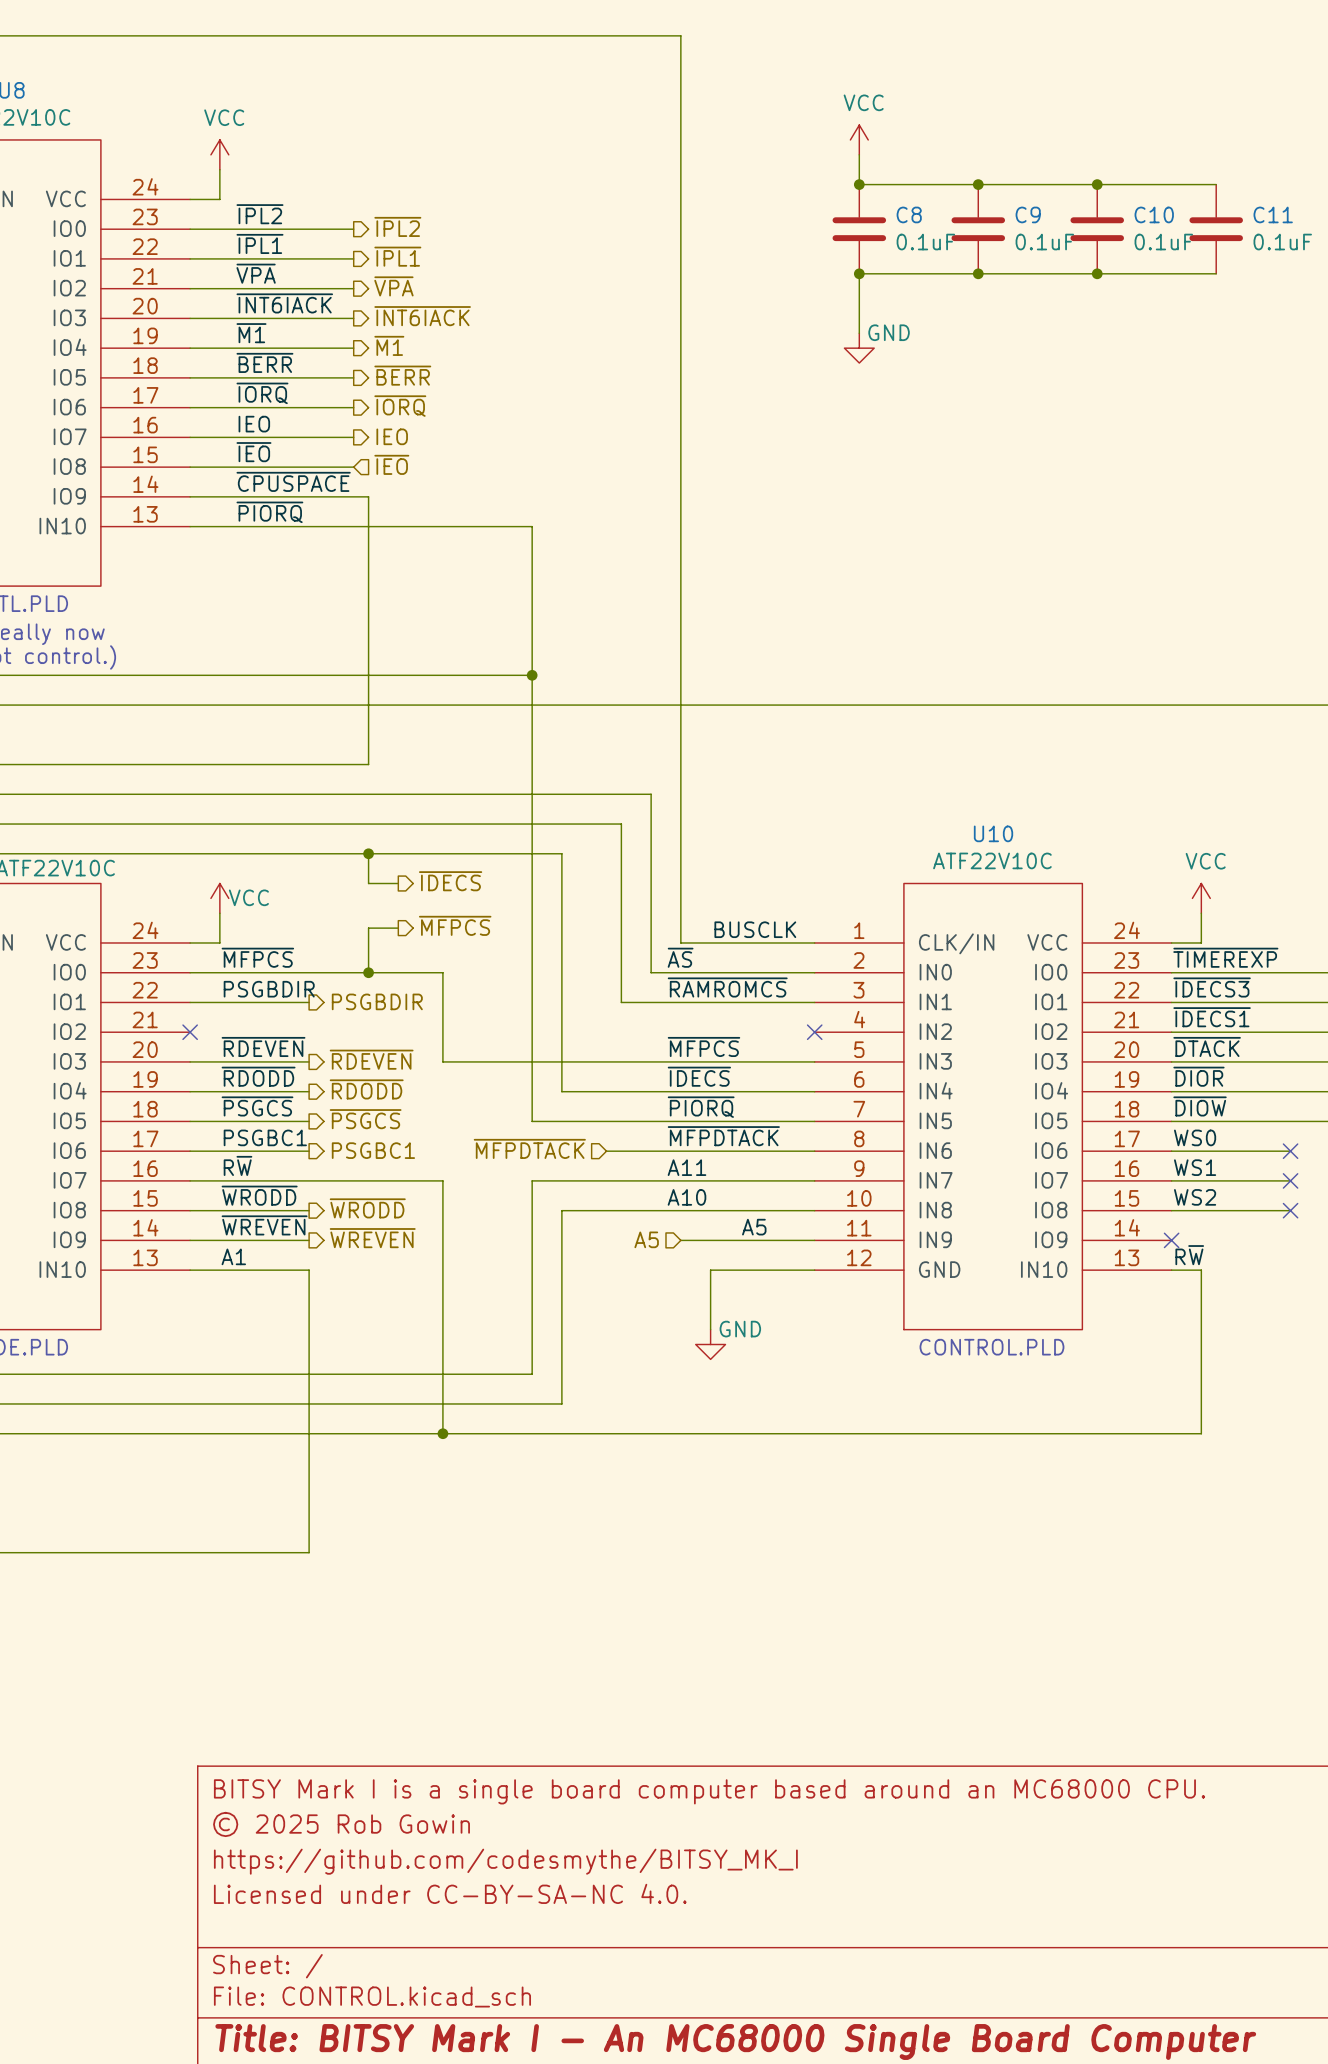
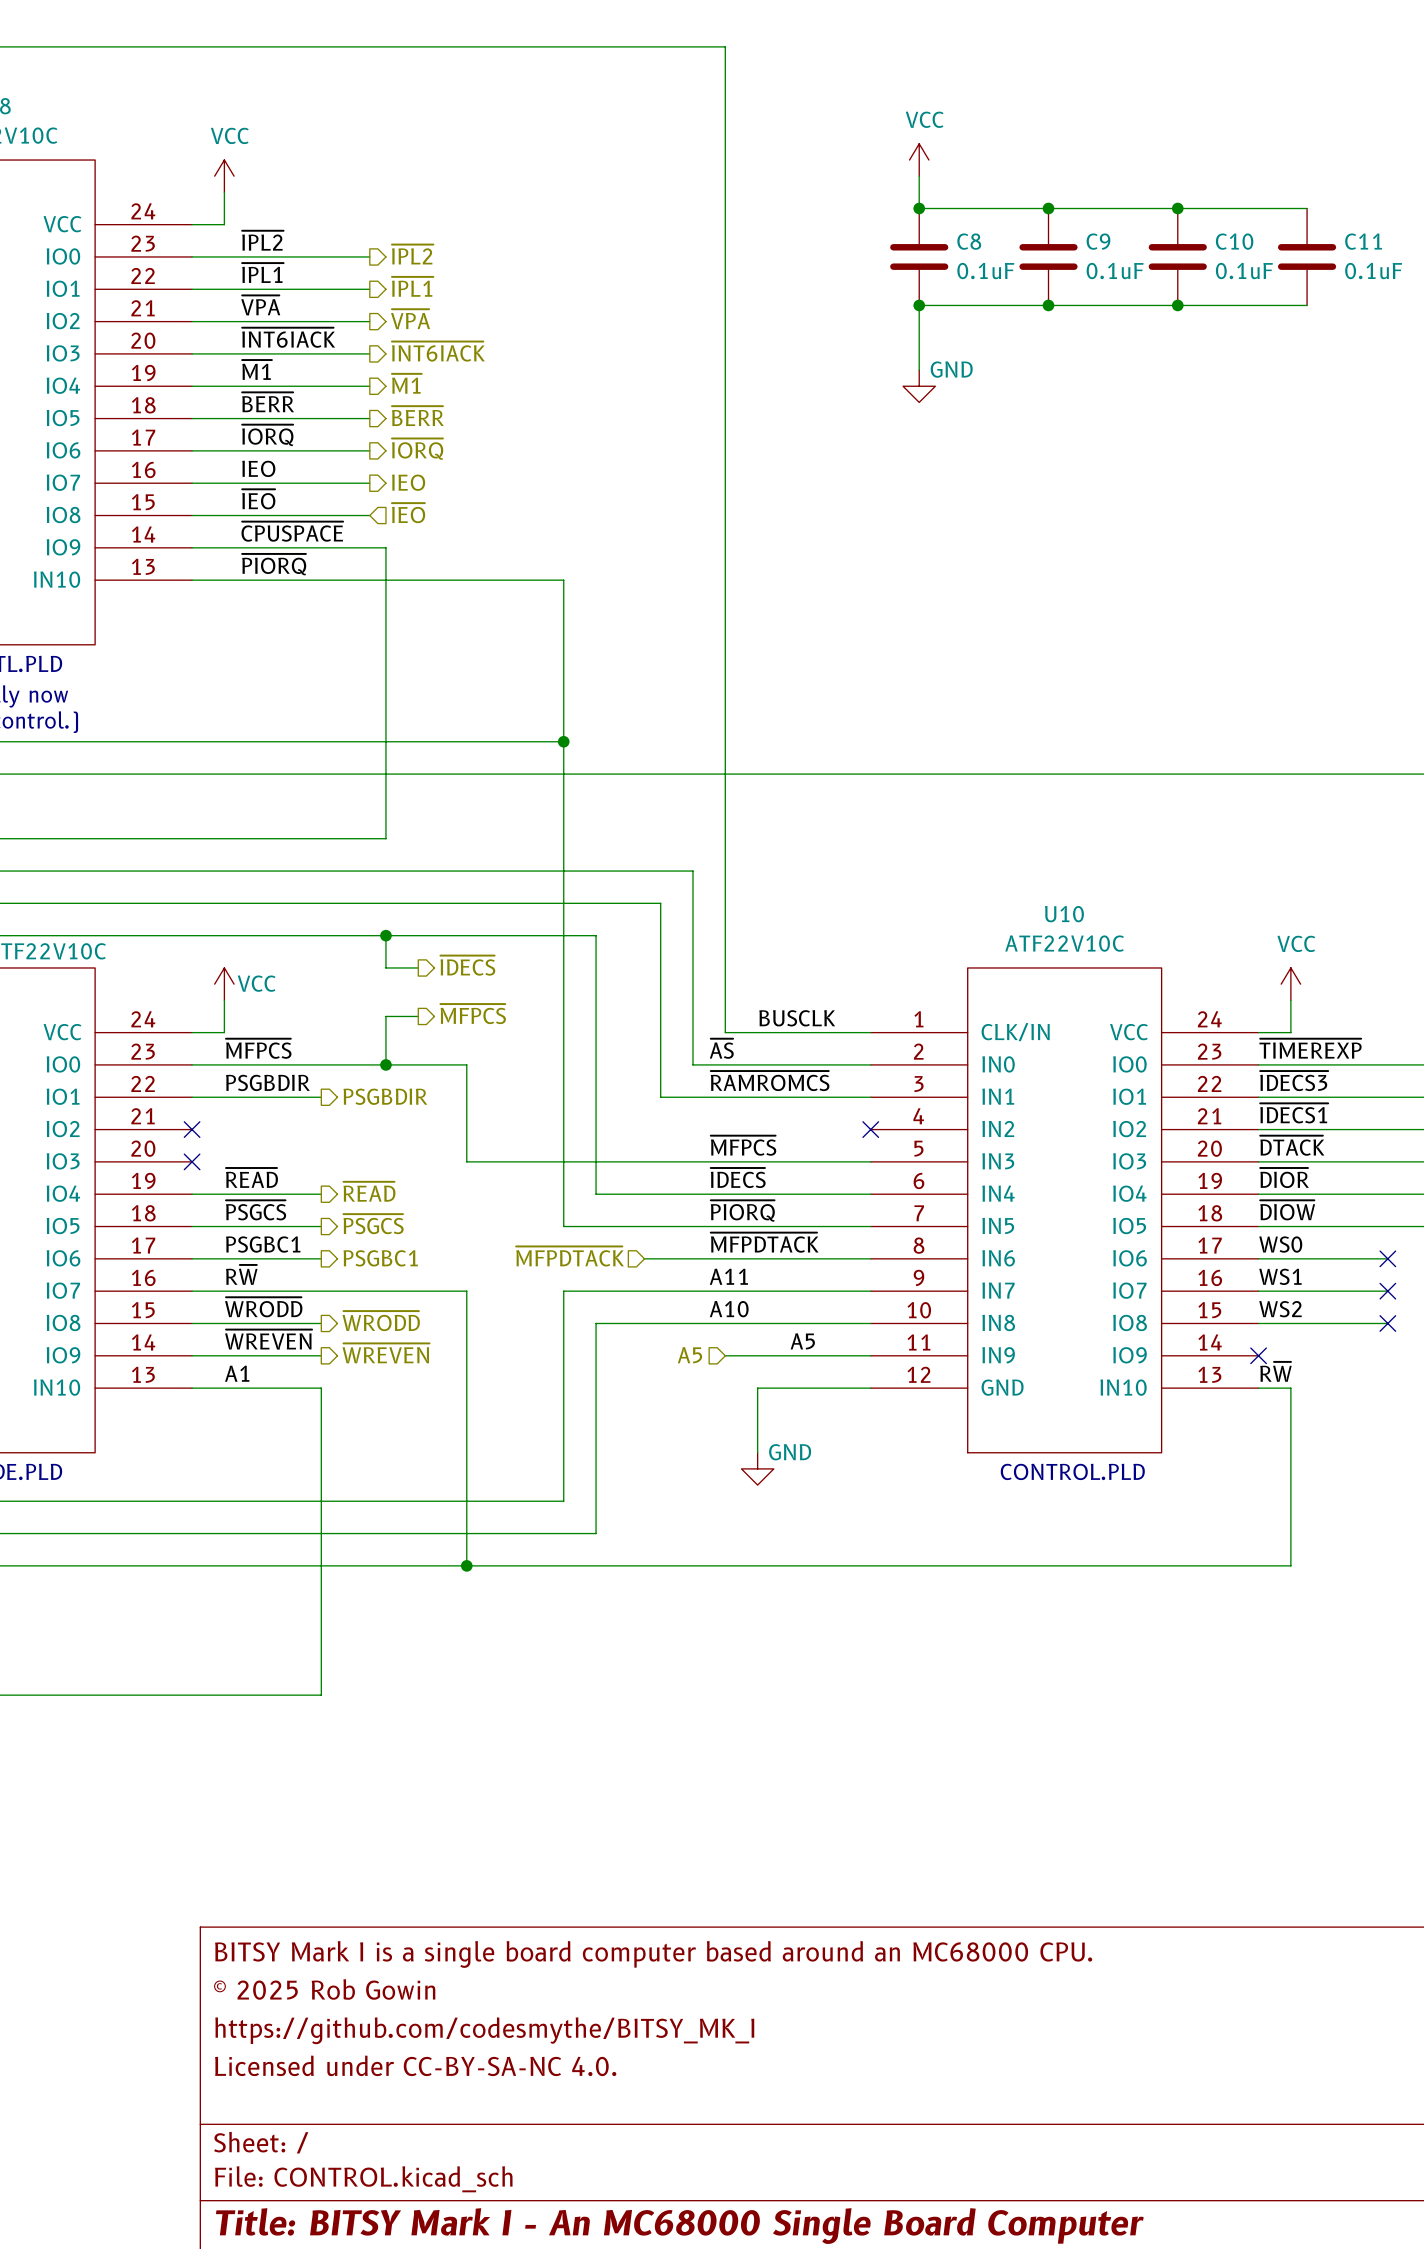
label: ~{RDEVEN} (263, 1046) -> none
hierarchical label: ~{RDEVEN} (371, 1059) -> none
wire: (190, 1061) (309, 1061) -> none
no-connect mark: none -> (192, 1161)
label: ~{RDODD} (258, 1076) -> ~{READ} (251, 1177)
hierarchical label: ~{RDODD} (366, 1089) -> ~{READ} (369, 1191)

